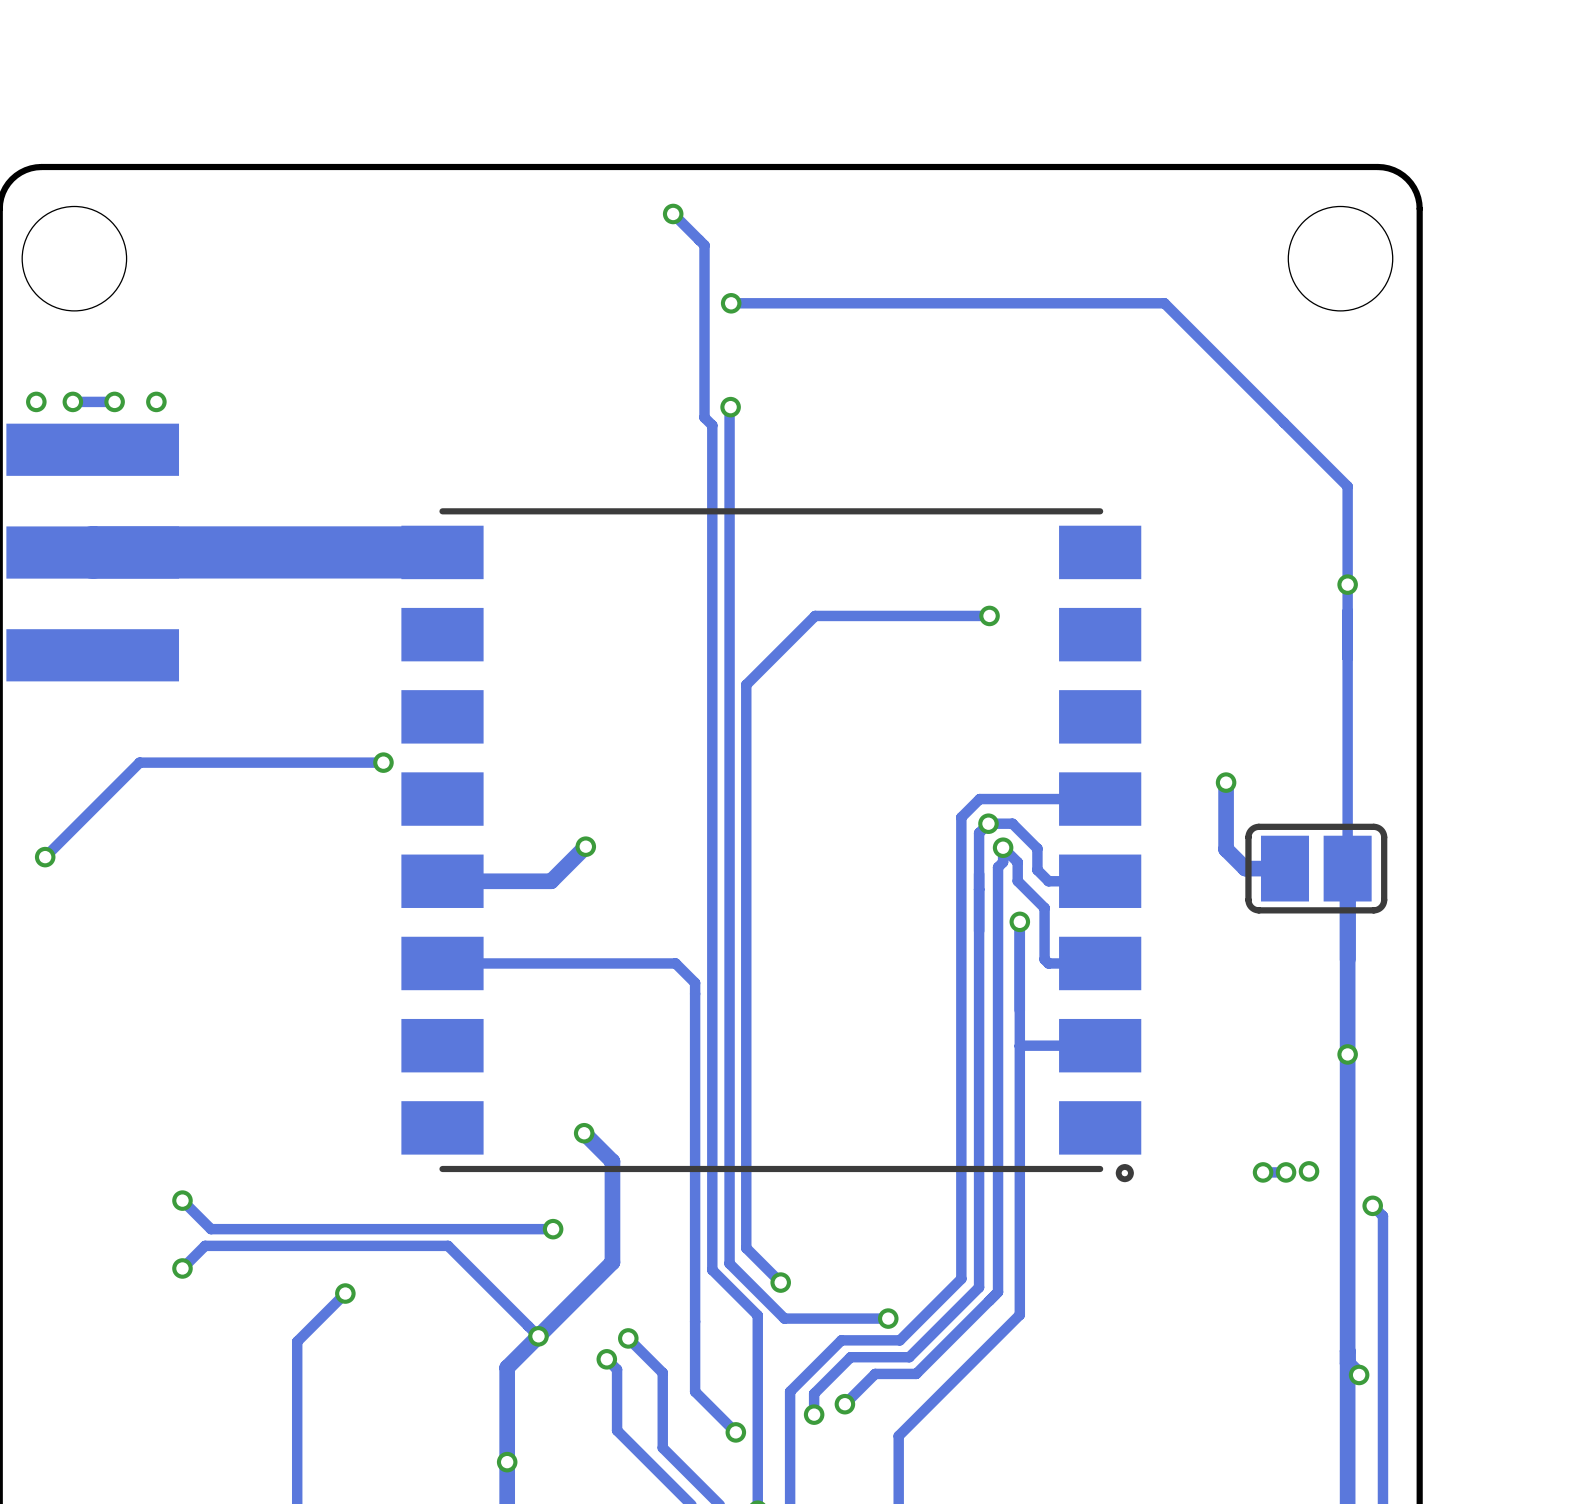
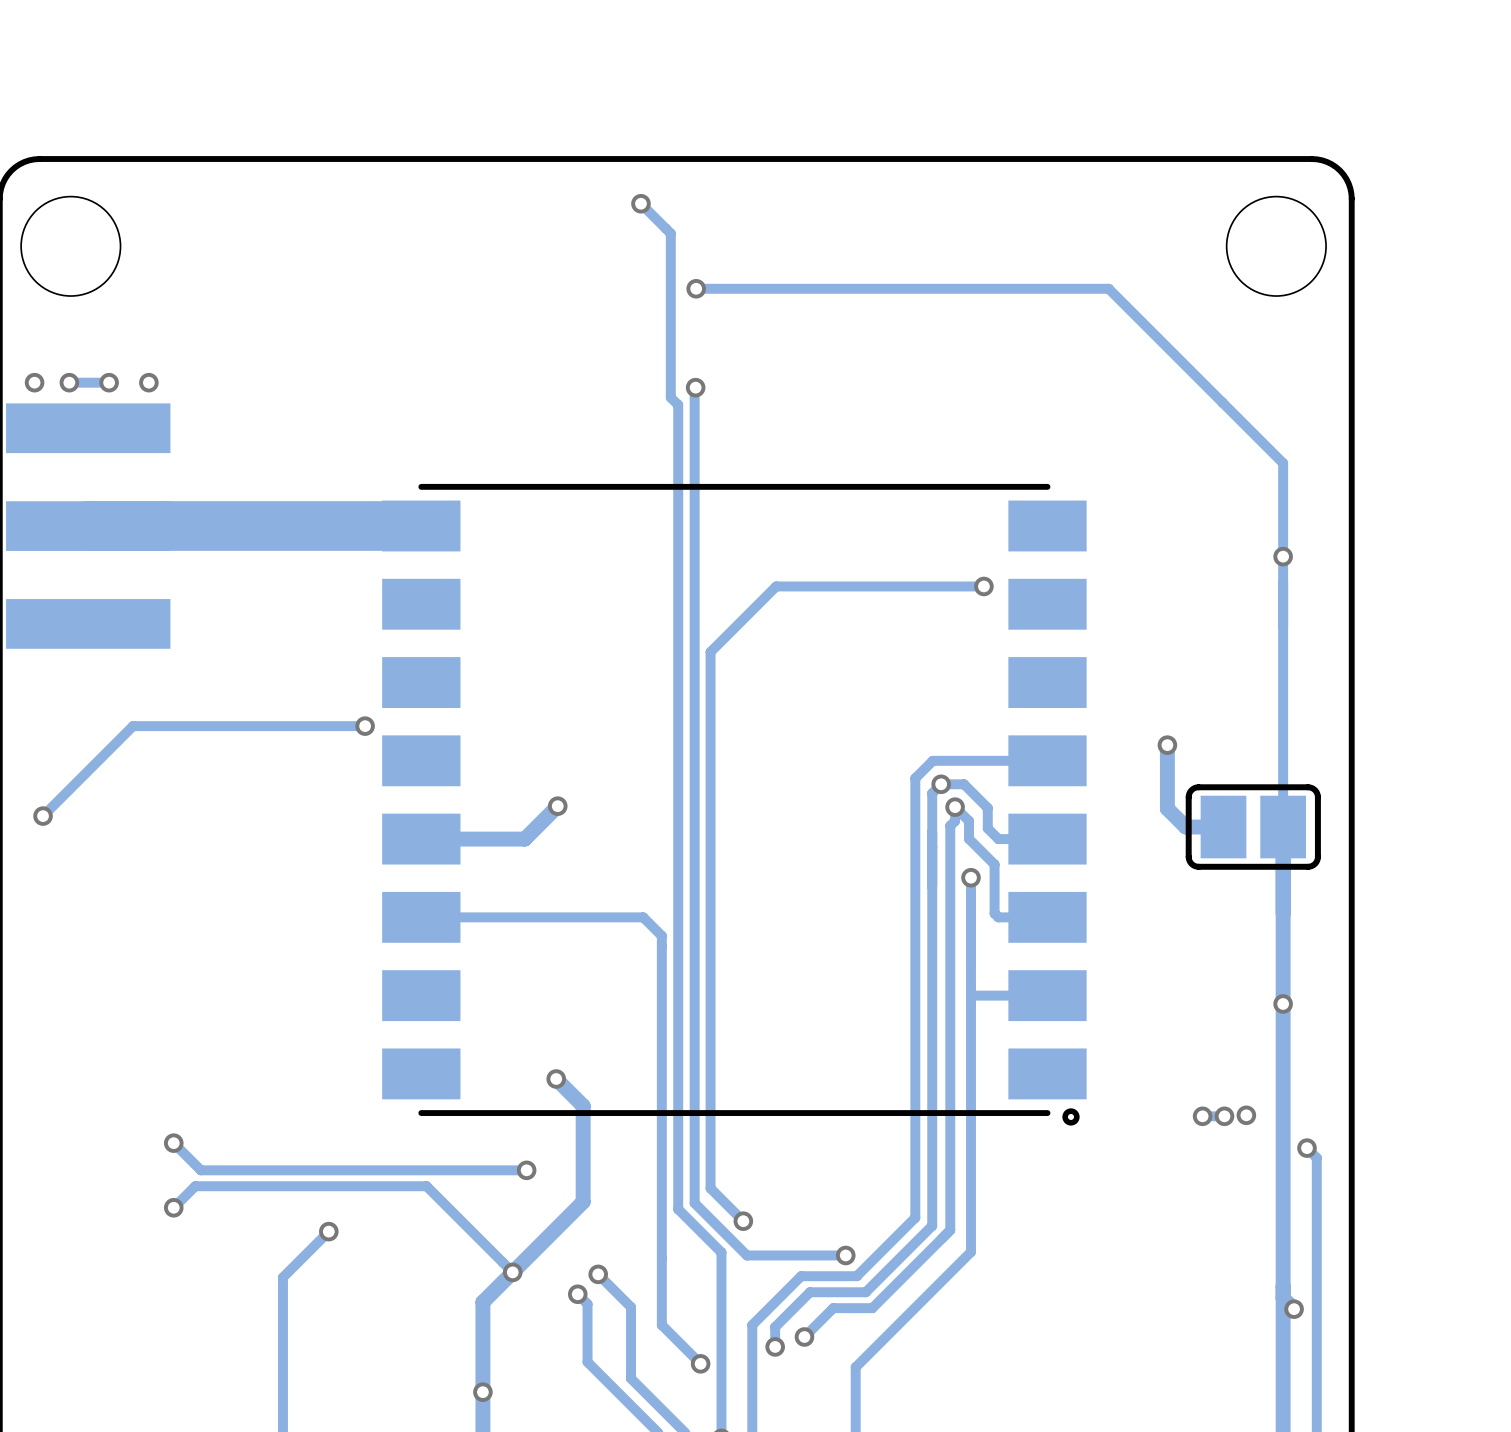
via position: (989, 615) -> (983, 586)
track: none -> (983, 586) (942, 586)

